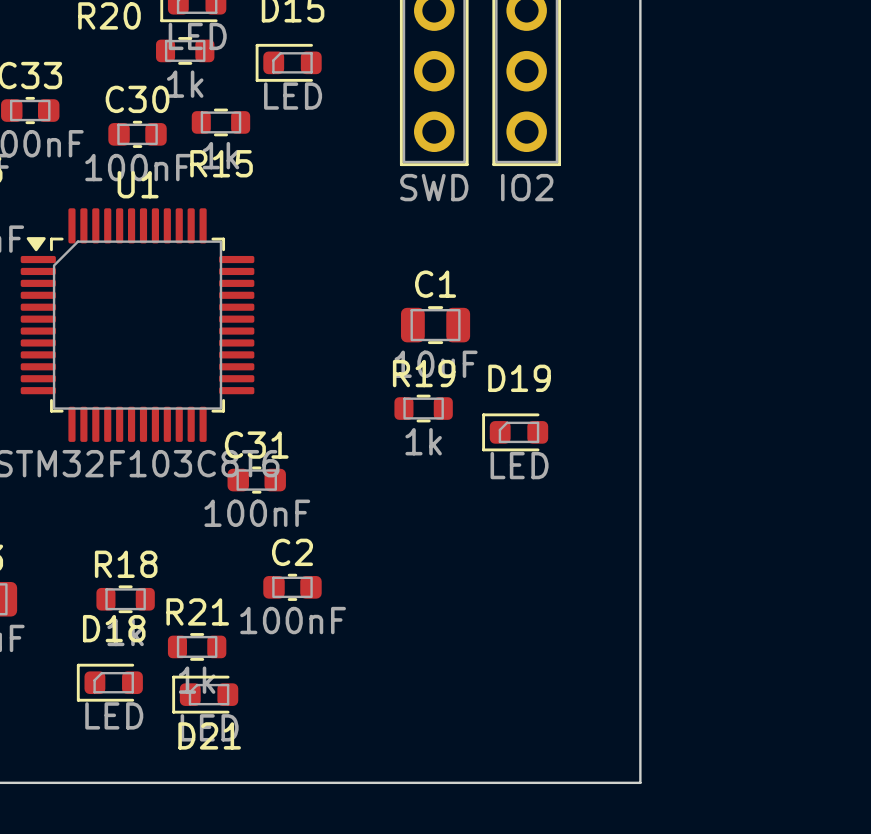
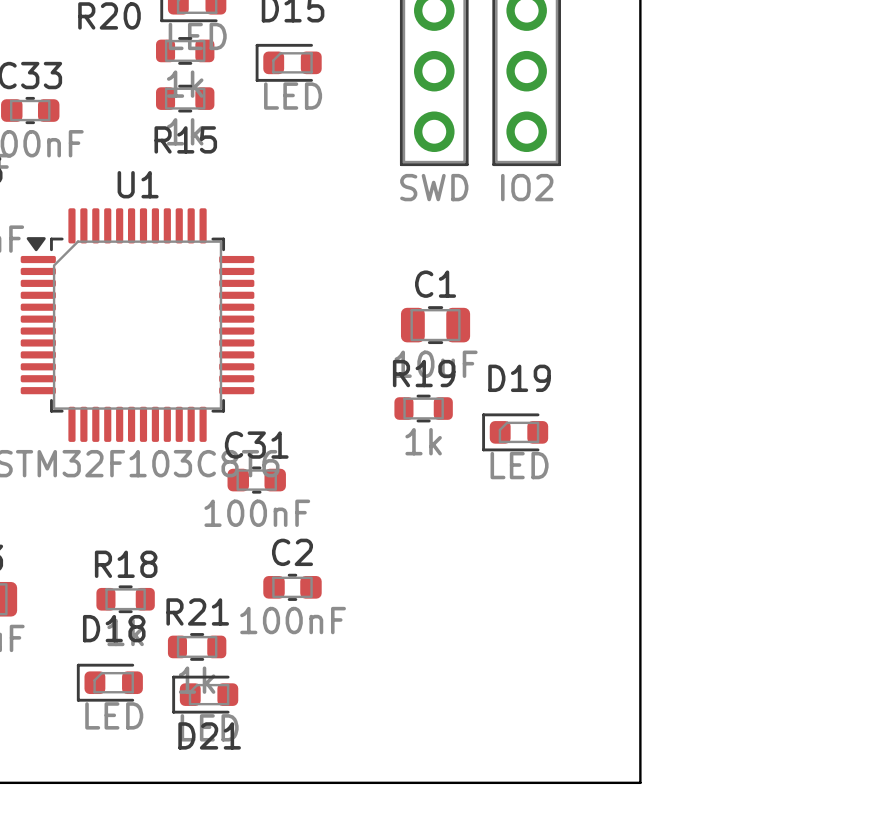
R15 position: (220, 122) -> (185, 98)
C30: 100nF (137, 134) -> none

